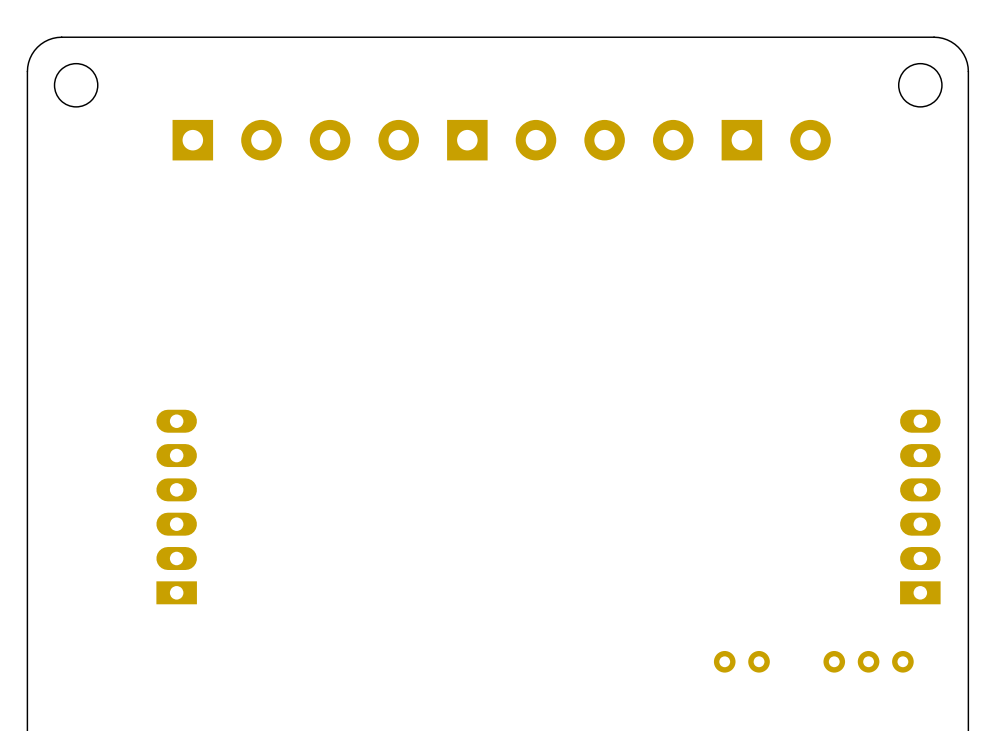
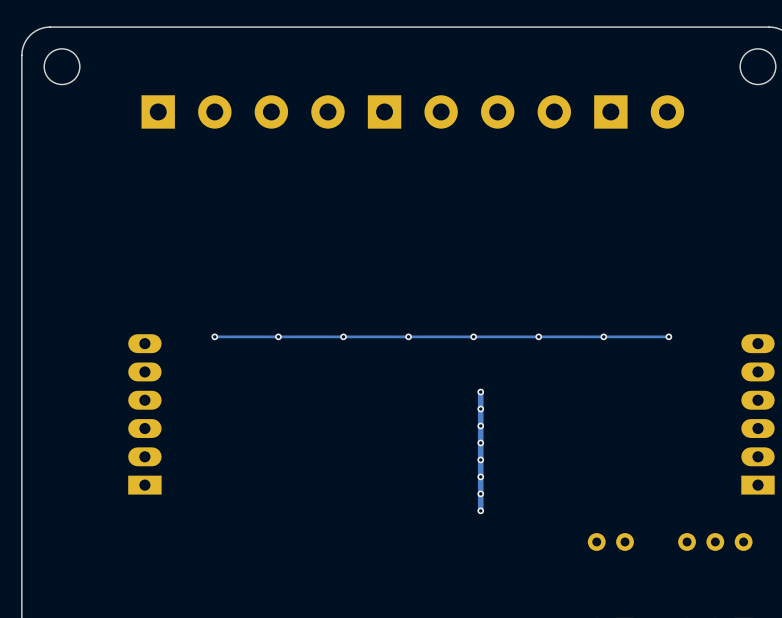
via: none -> (214, 336)
via: none -> (278, 336)
via: none -> (343, 336)
via: none -> (408, 336)
via: none -> (473, 336)
via: none -> (538, 336)
via: none -> (603, 336)
track: none -> (668, 336) (214, 336)
via: none -> (668, 336)
track: none -> (480, 392) (480, 510)
via: none -> (480, 392)
via: none -> (480, 409)
via: none -> (480, 425)
via: none -> (480, 442)
via: none -> (480, 459)
via: none -> (480, 476)
via: none -> (480, 493)
via: none -> (480, 510)

